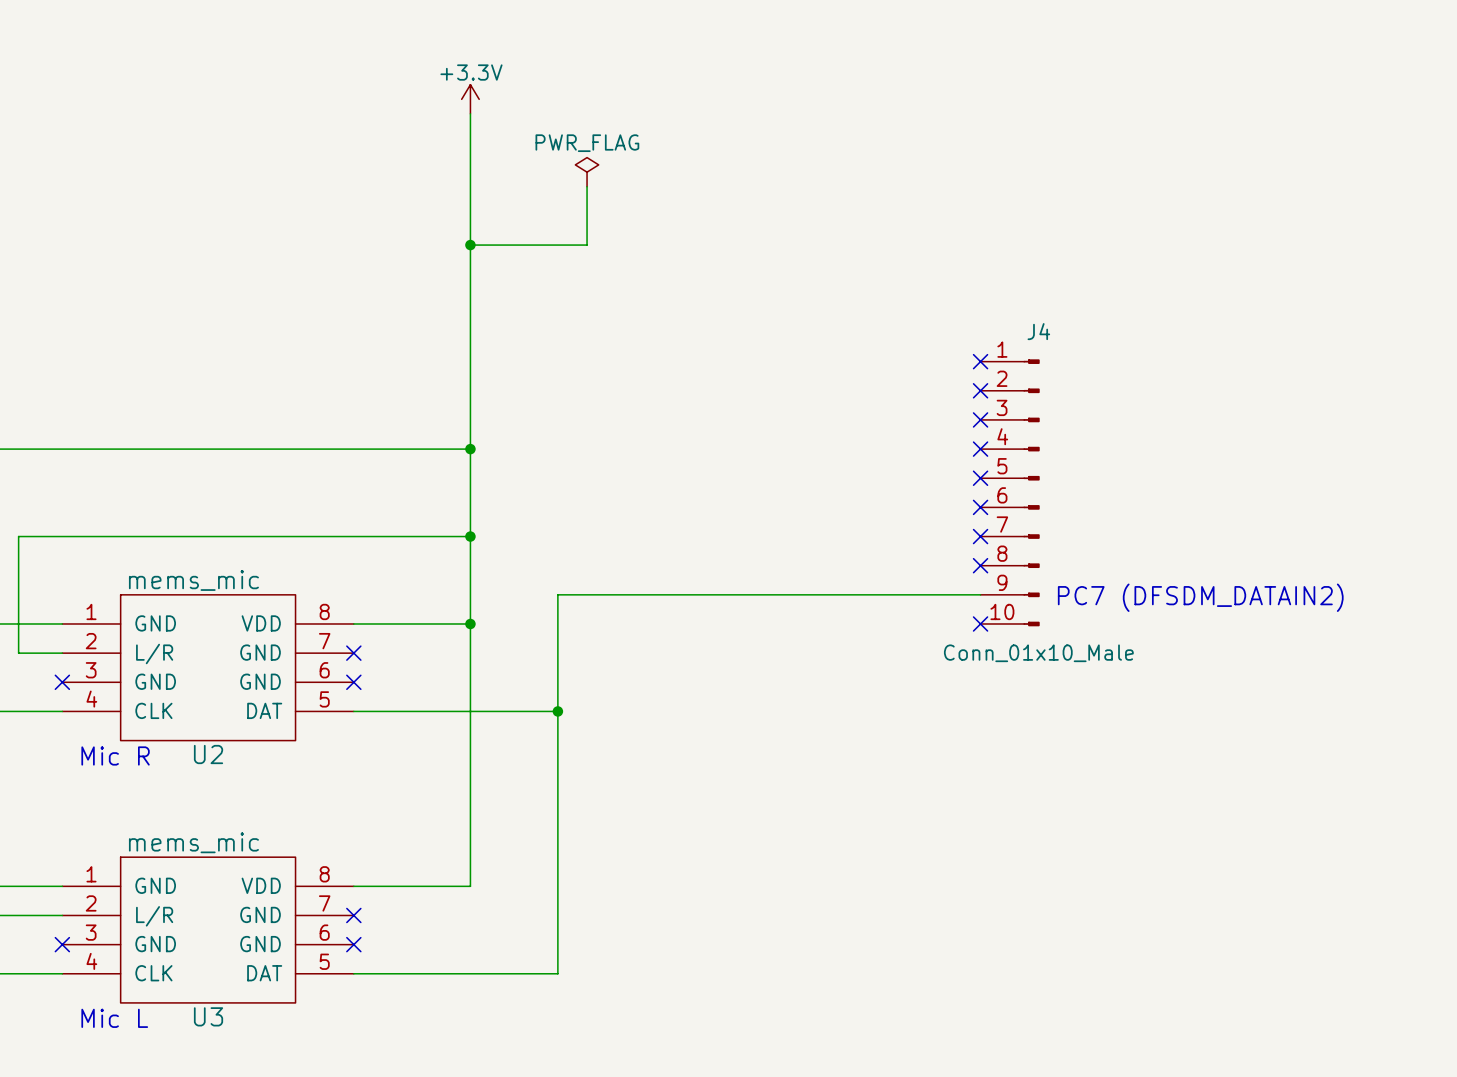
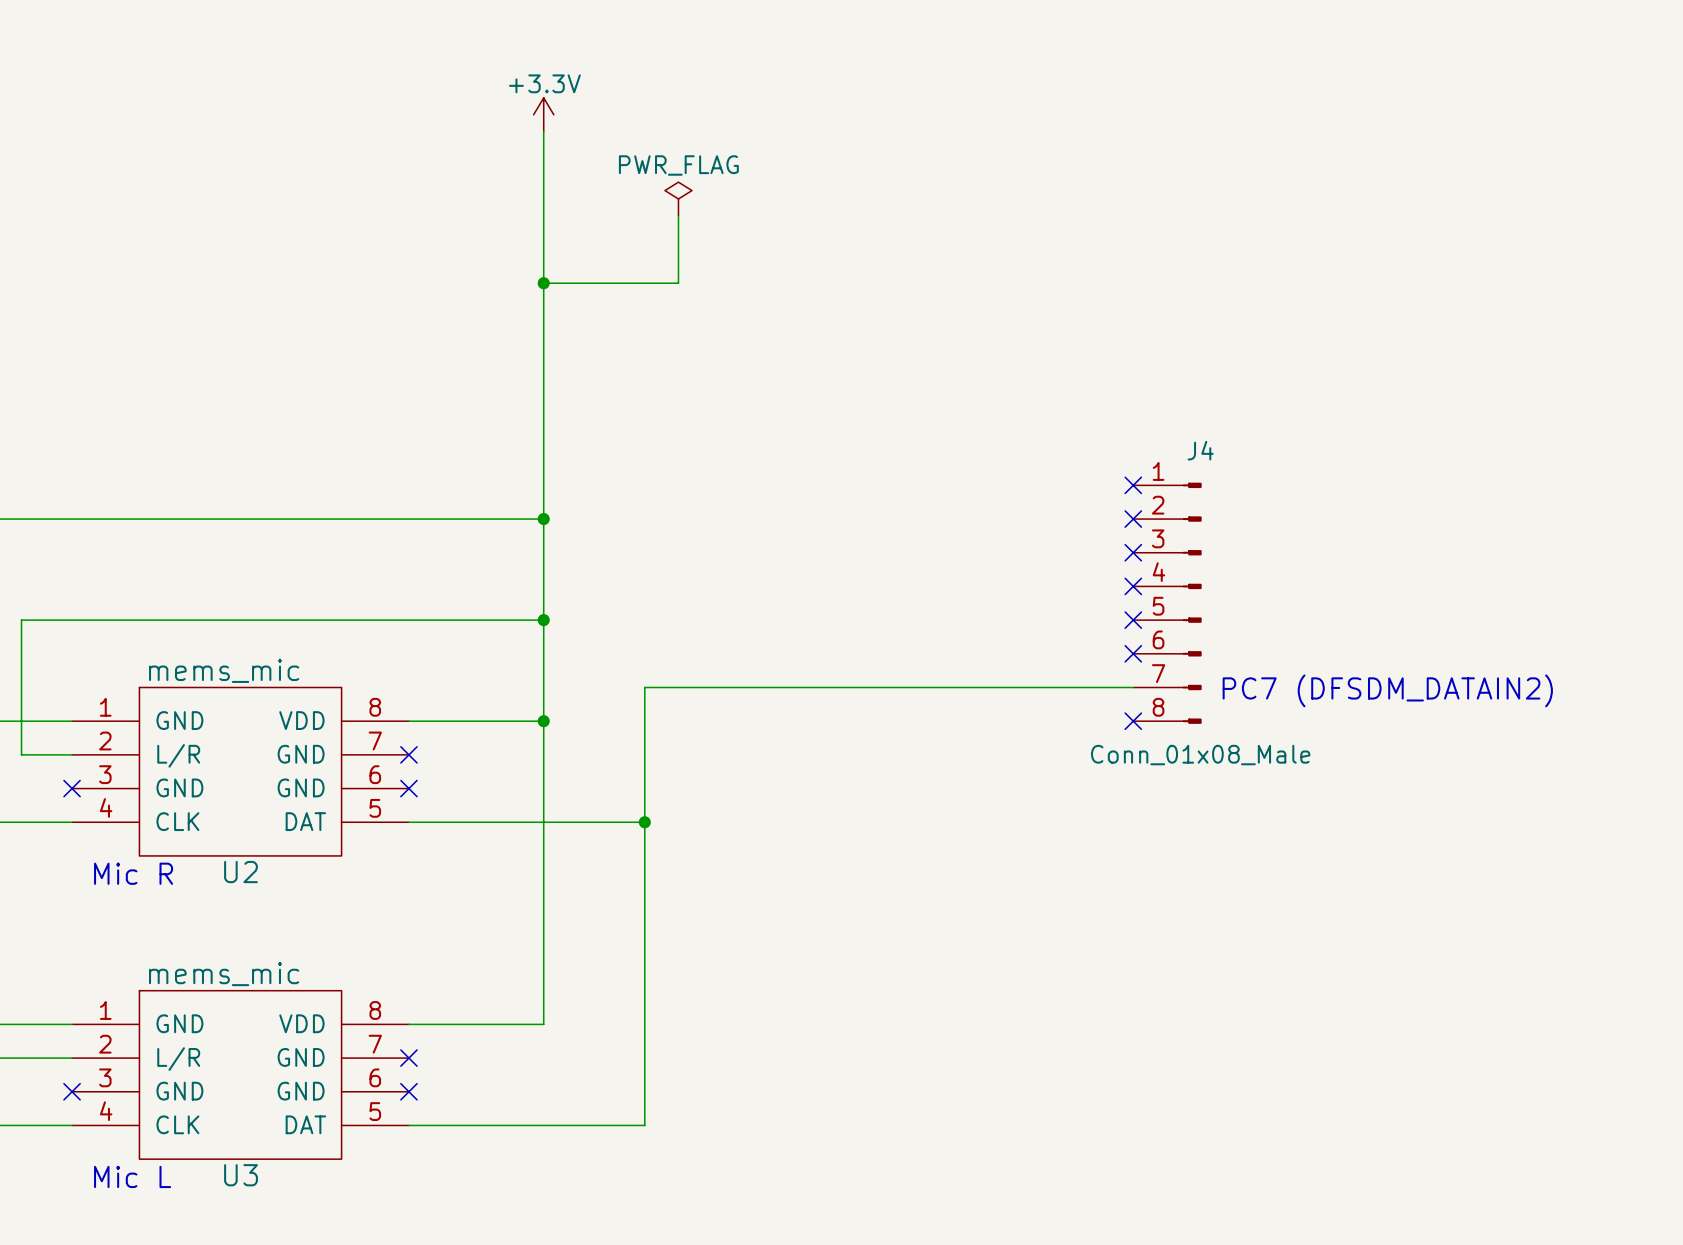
J4 name position: J4 (1038, 331) -> J4 (1200, 450)
J4 symbol: [980, 359, 1040, 627] -> [1133, 482, 1202, 724]
no-connect mark: (980, 361) -> none
no-connect mark: (980, 390) -> none
J4 value: Conn_01x10_Male (1038, 653) -> Conn_01x08_Male (1200, 755)

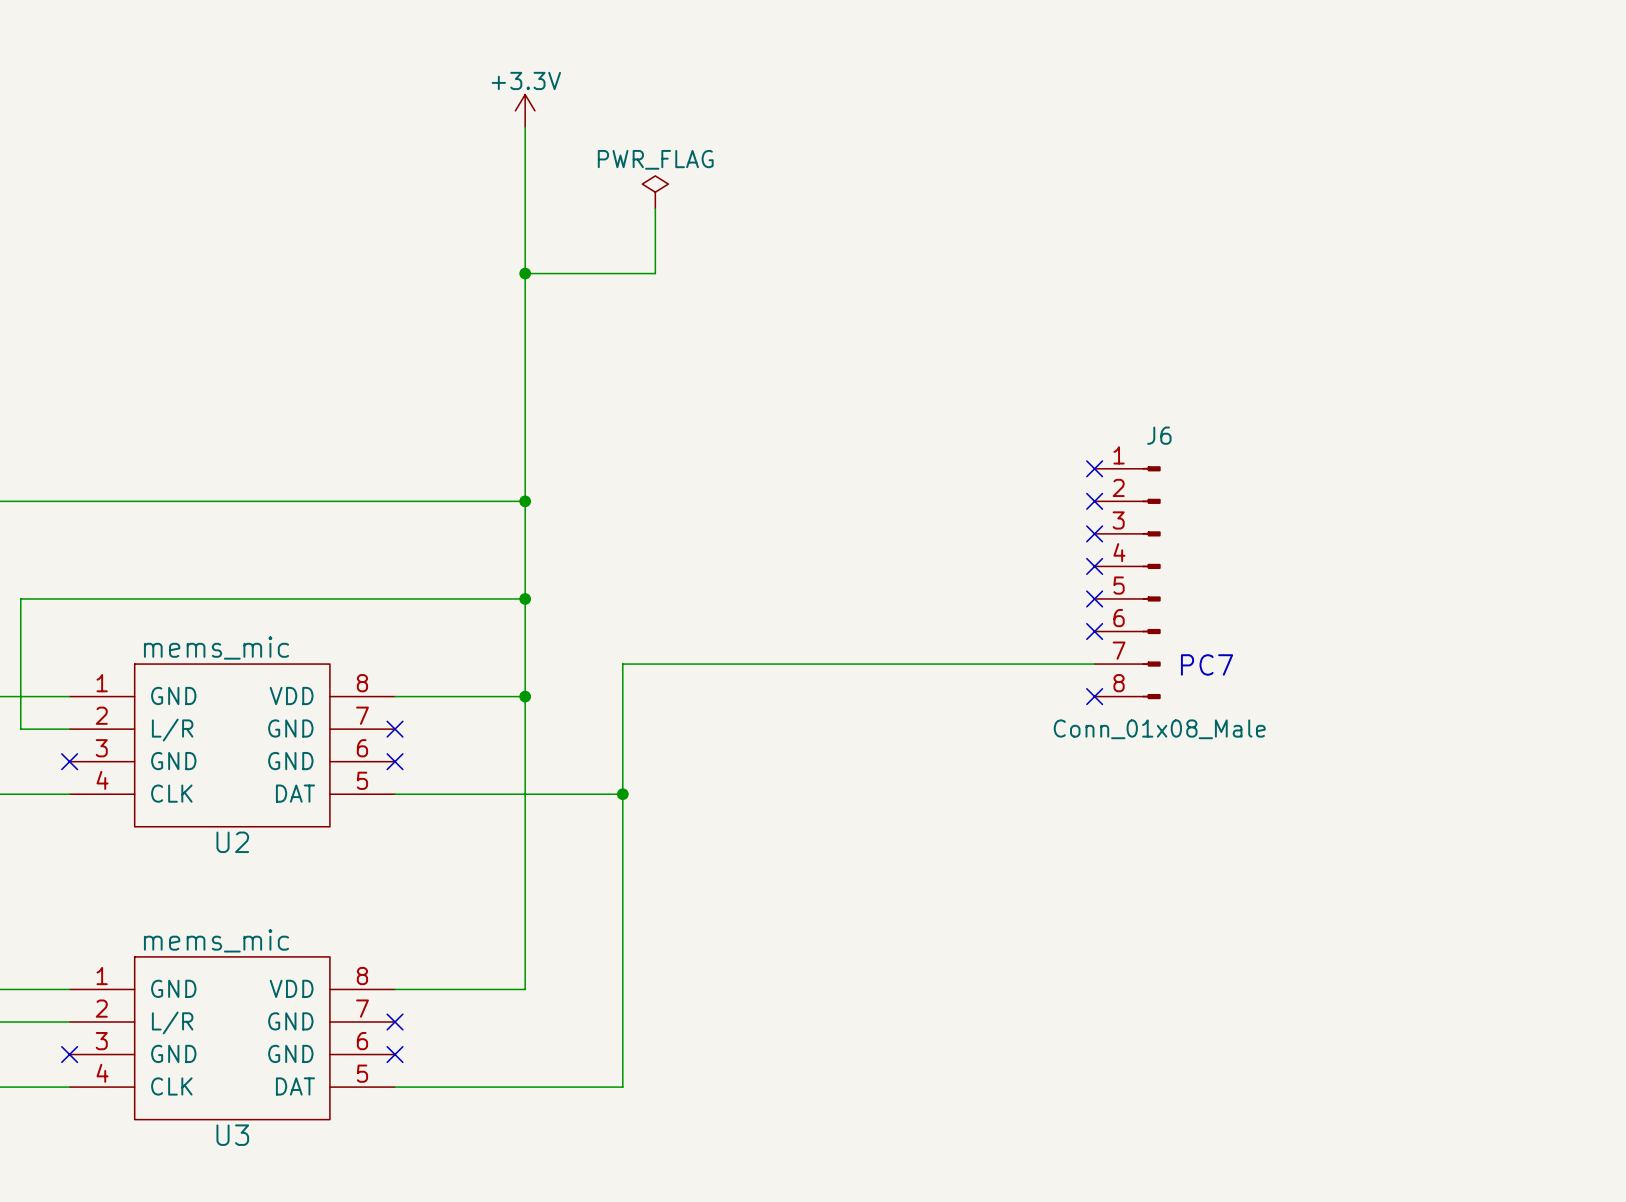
J4 name: J4 (1200, 450) -> J6 (1159, 435)
text: PC7 (DFSDM_DATAIN2) (1387, 690) -> PC7 (1207, 664)
text: Mic R (133, 873) -> none
text: Mic L (132, 1176) -> none

